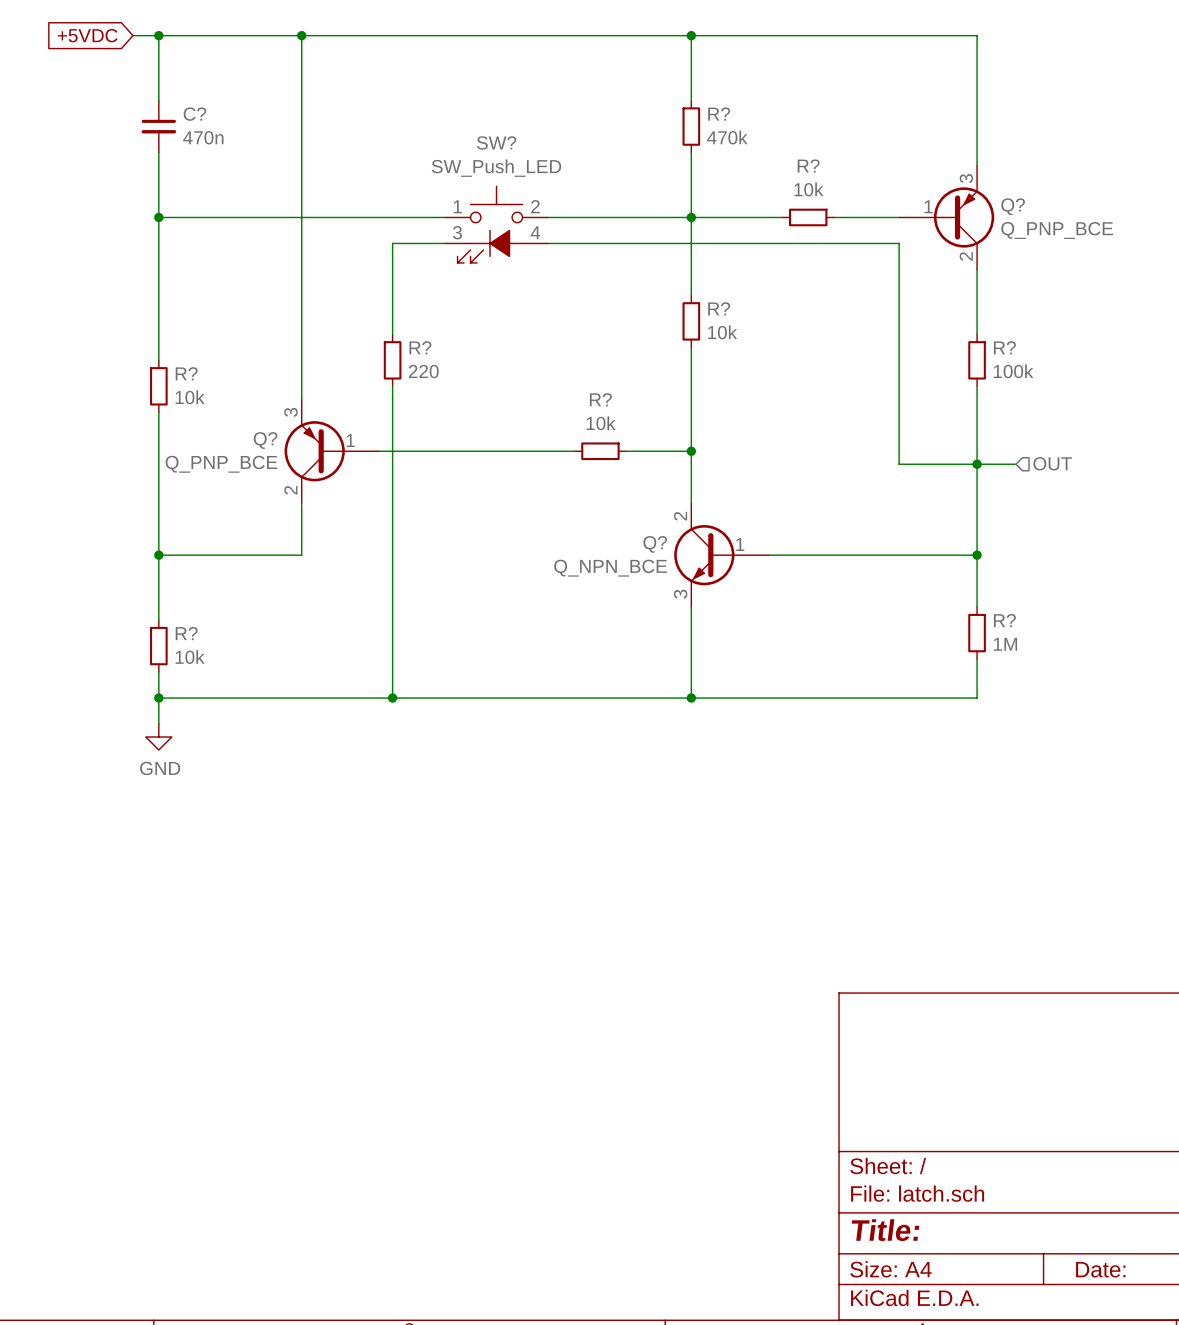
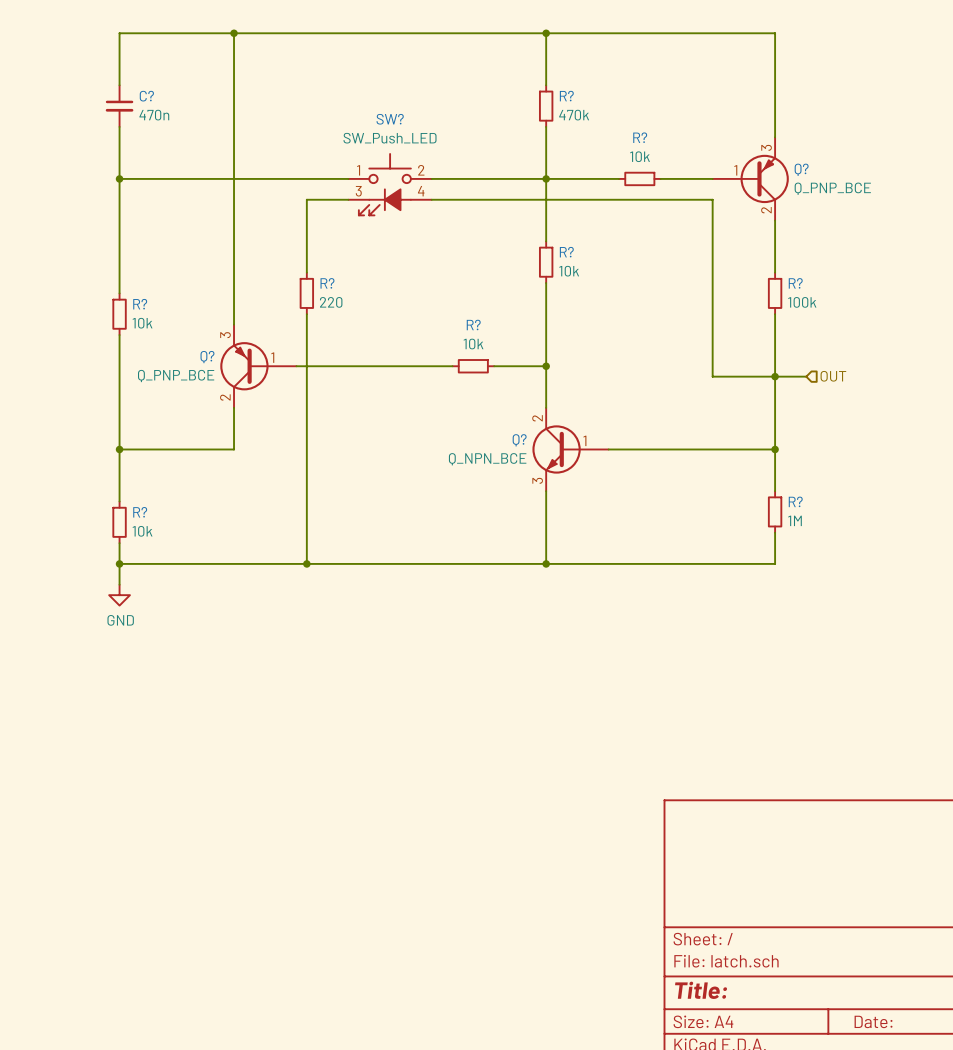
global label: +5VDC (87, 35) -> none
wire: (132, 35) (158, 35) -> none
junction: (158, 35) -> none

